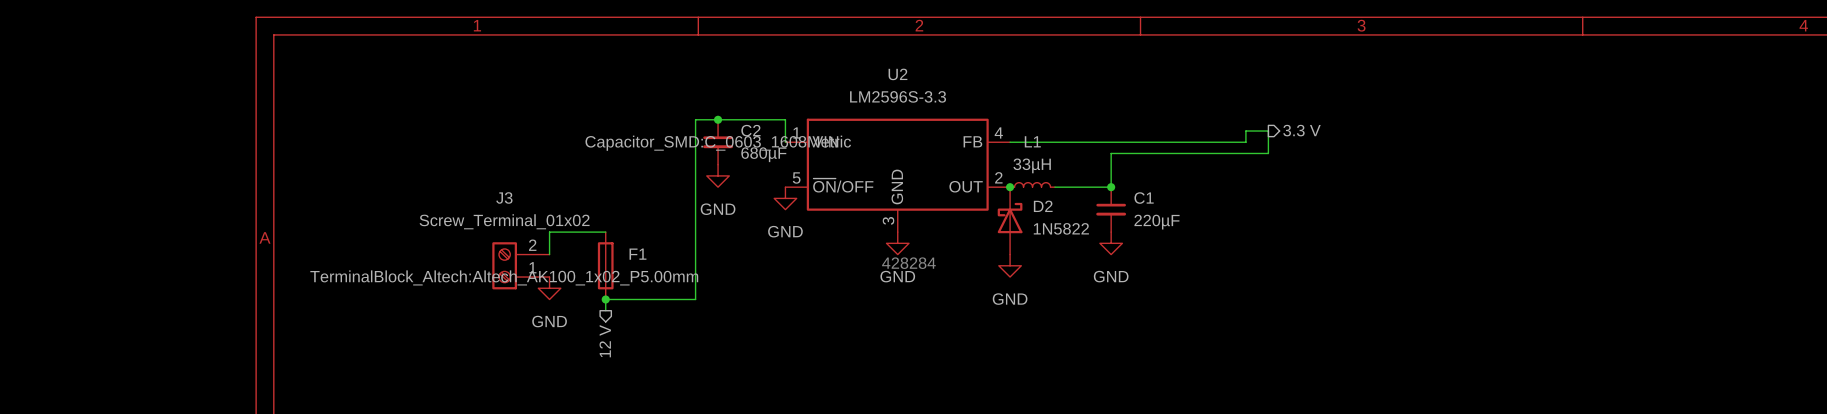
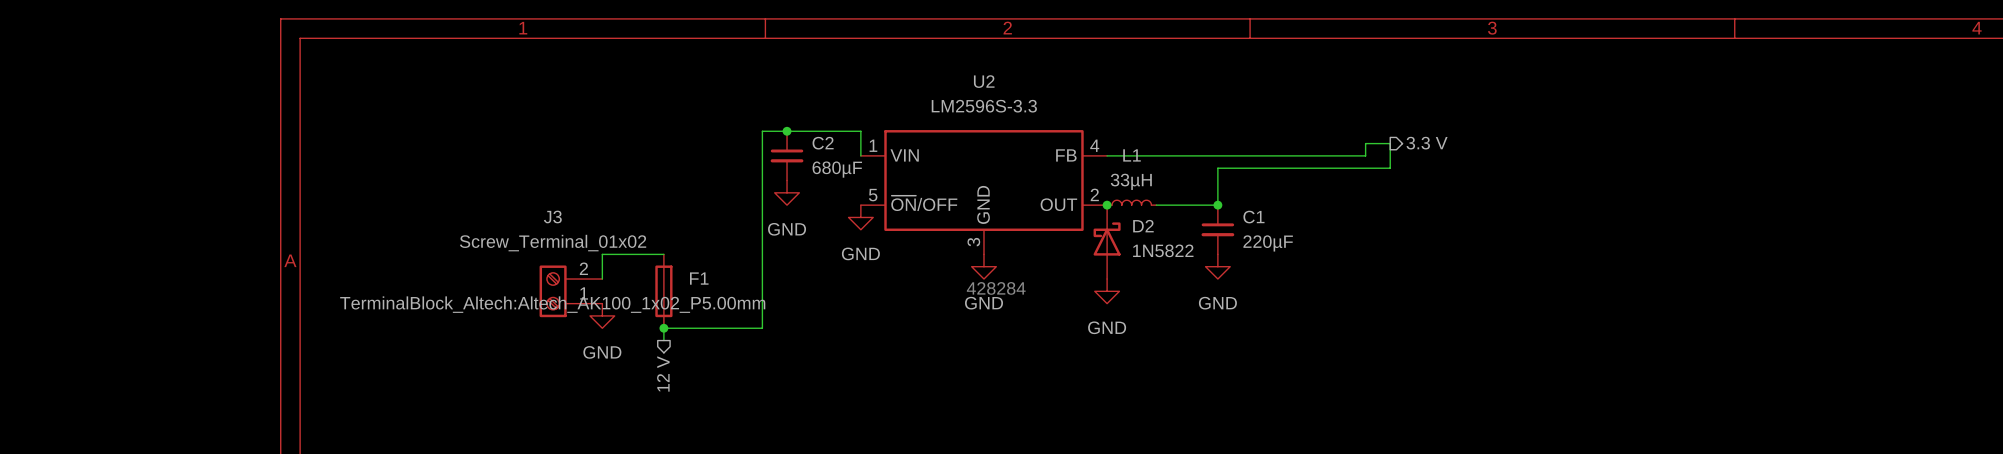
C2 text: Capacitor_SMD:C_0603_1608Metric (718, 143) -> none

